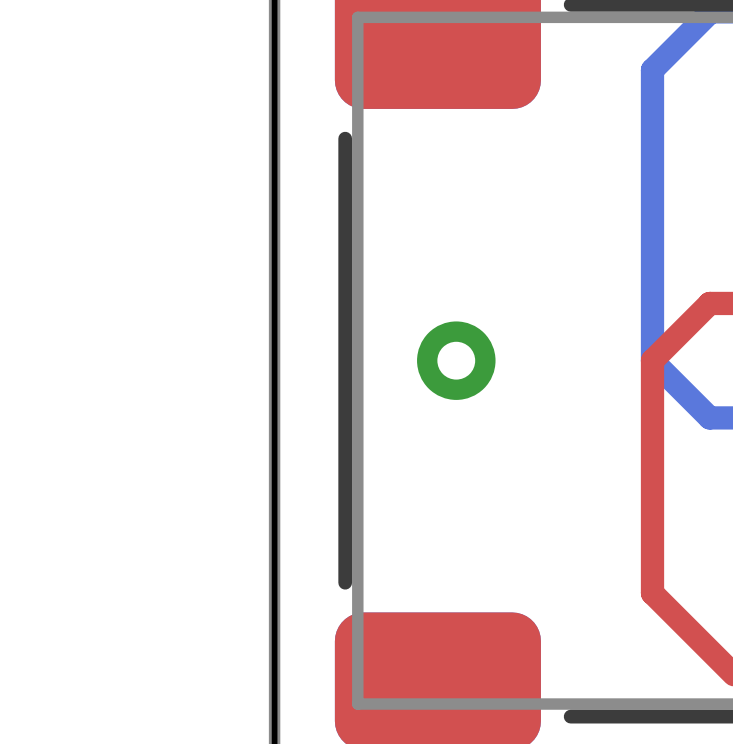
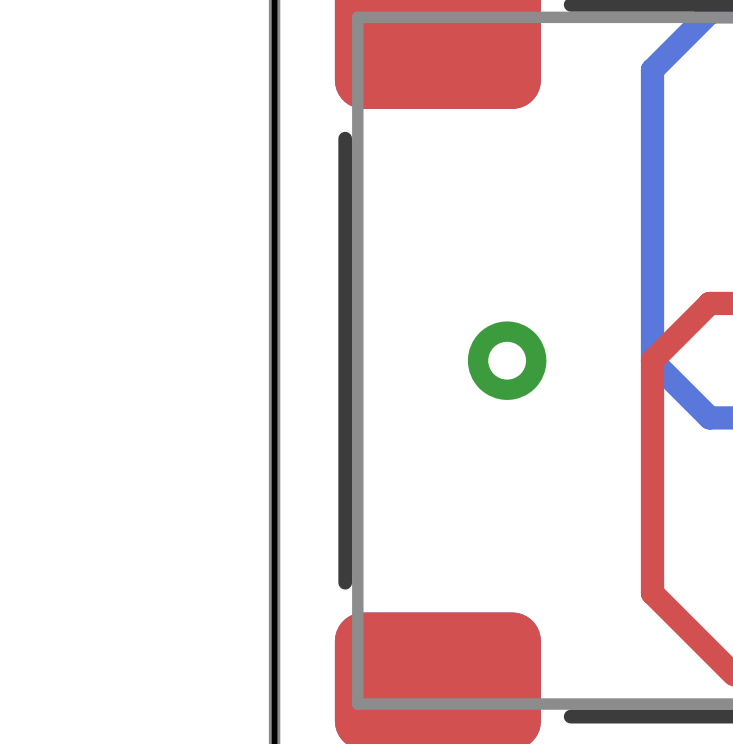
via position: (456, 360) -> (507, 360)

